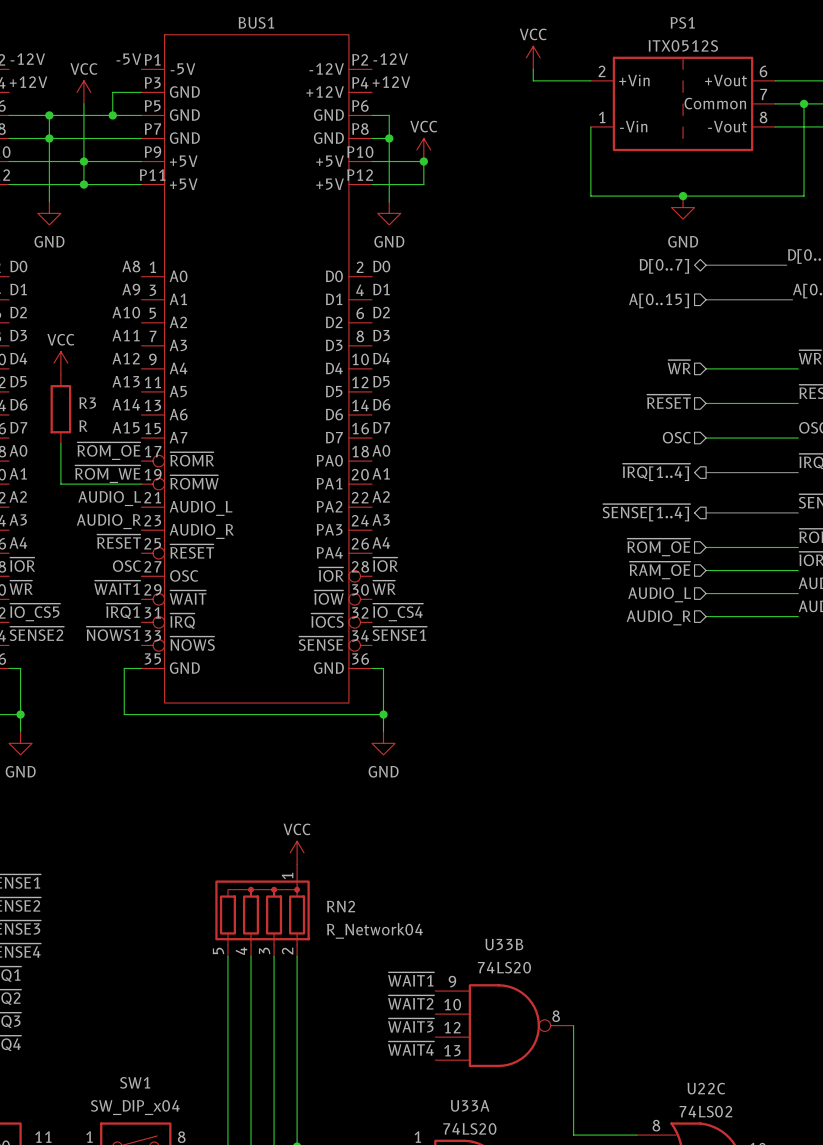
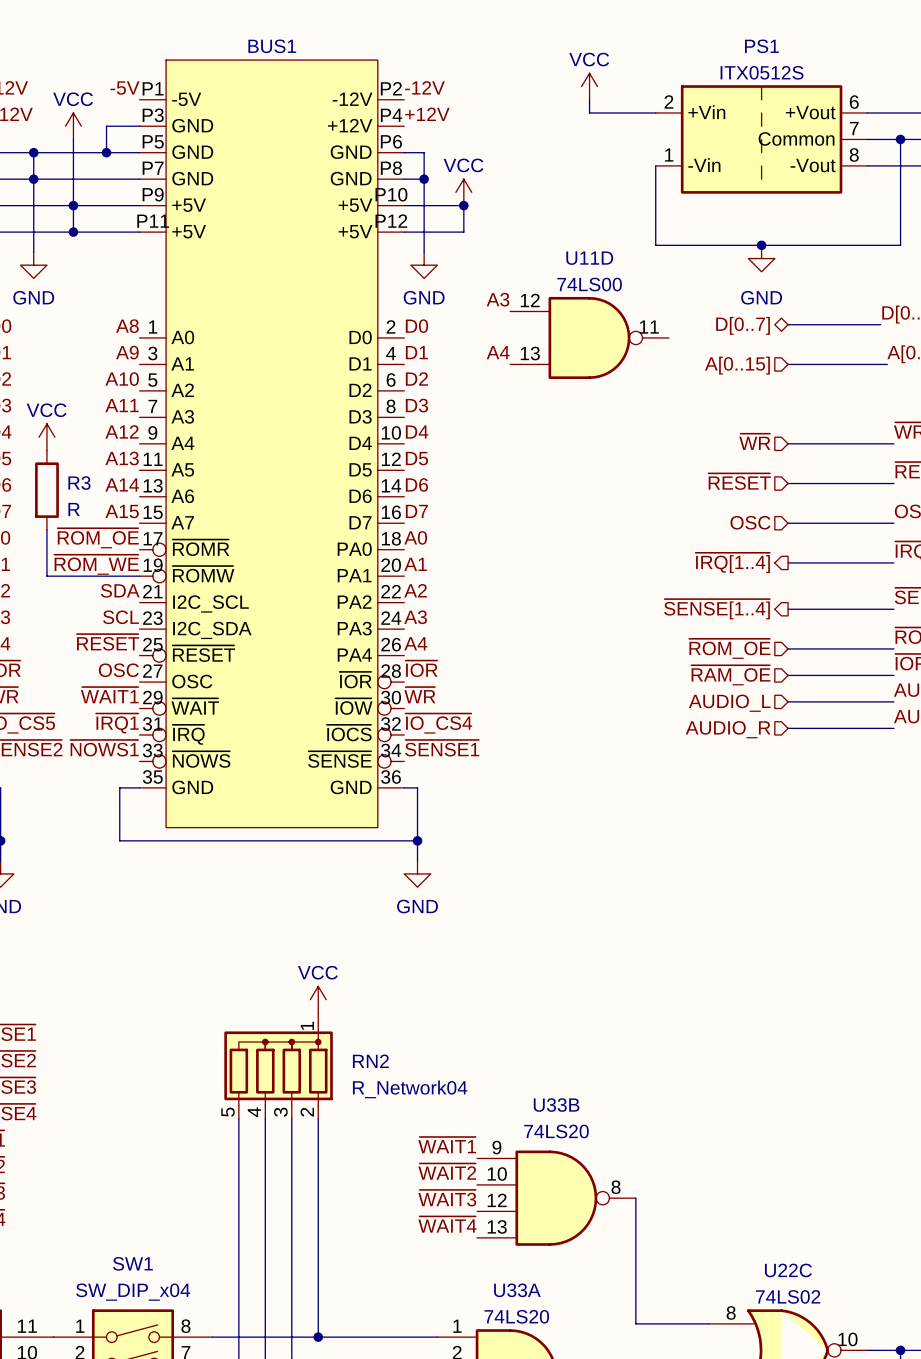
label: none -> A3 (497, 299)
U11D: none -> 74LS00 (589, 337)
label: none -> A4 (498, 352)
label: AUDIO_L (109, 498) -> SDA (120, 590)
BUS1 pin name: AUDIO_L (201, 508) -> I2C_SCL (210, 603)
label: AUDIO_R (108, 521) -> SCL (121, 617)
BUS1 pin name: AUDIO_R (201, 531) -> I2C_SDA (212, 630)

